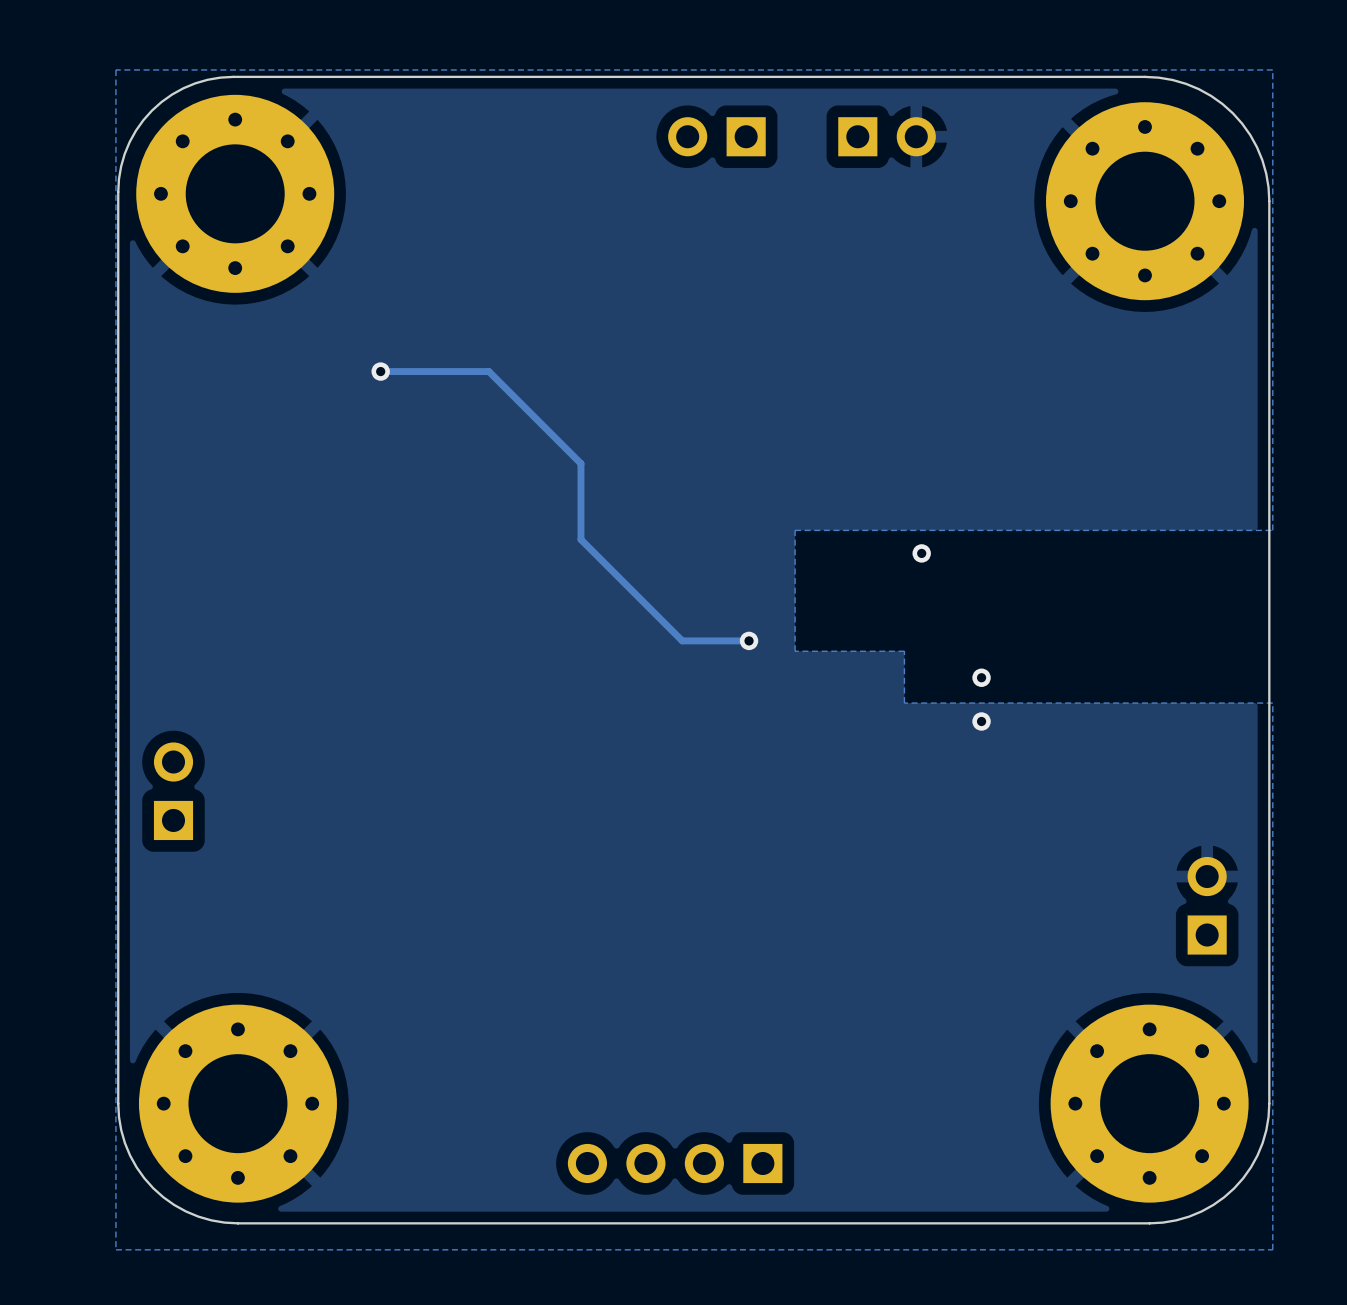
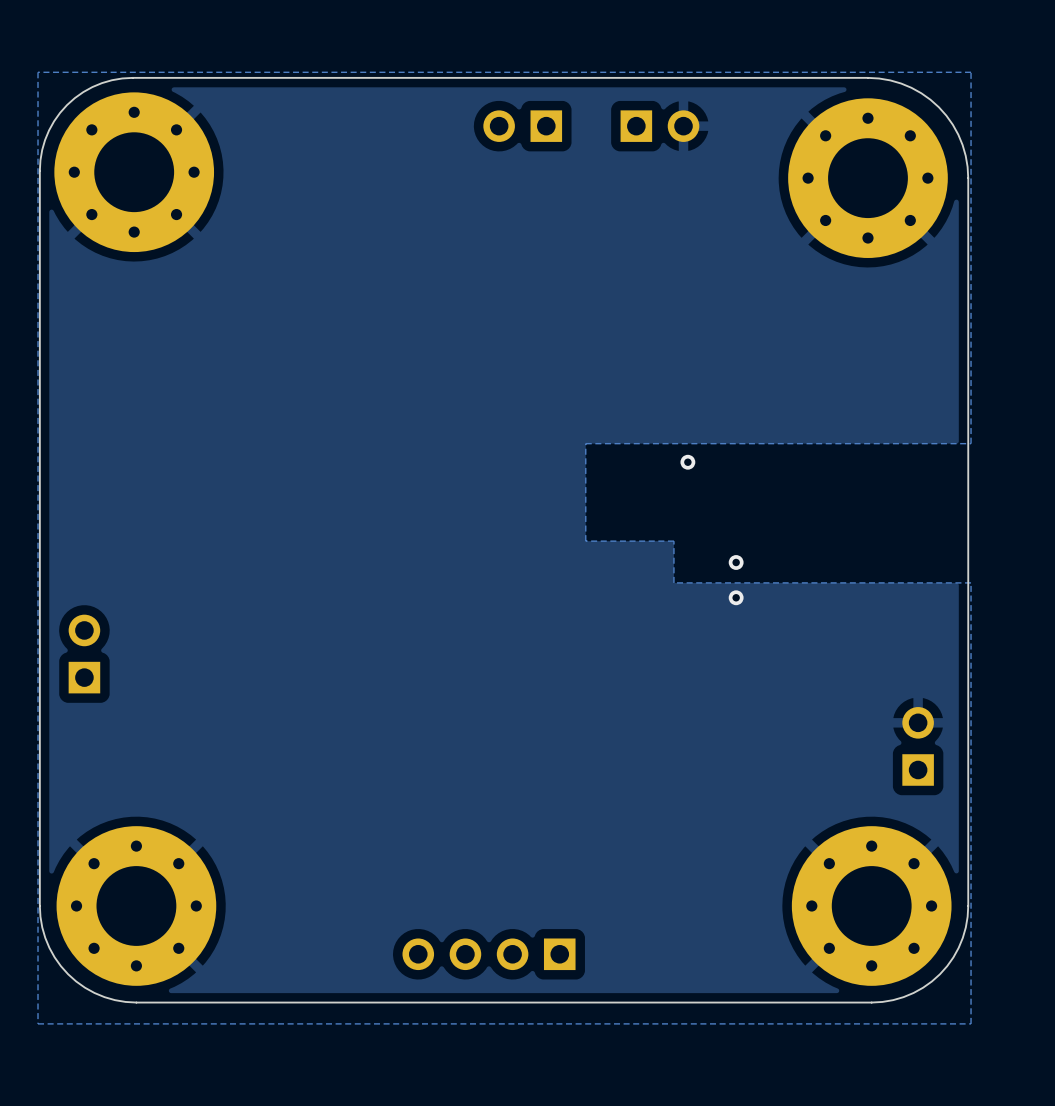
track: (380, 371) (488, 371) (580, 463) (580, 539) (682, 640) (749, 640) -> none
via: (380, 371) -> none
via: (749, 640) -> none

